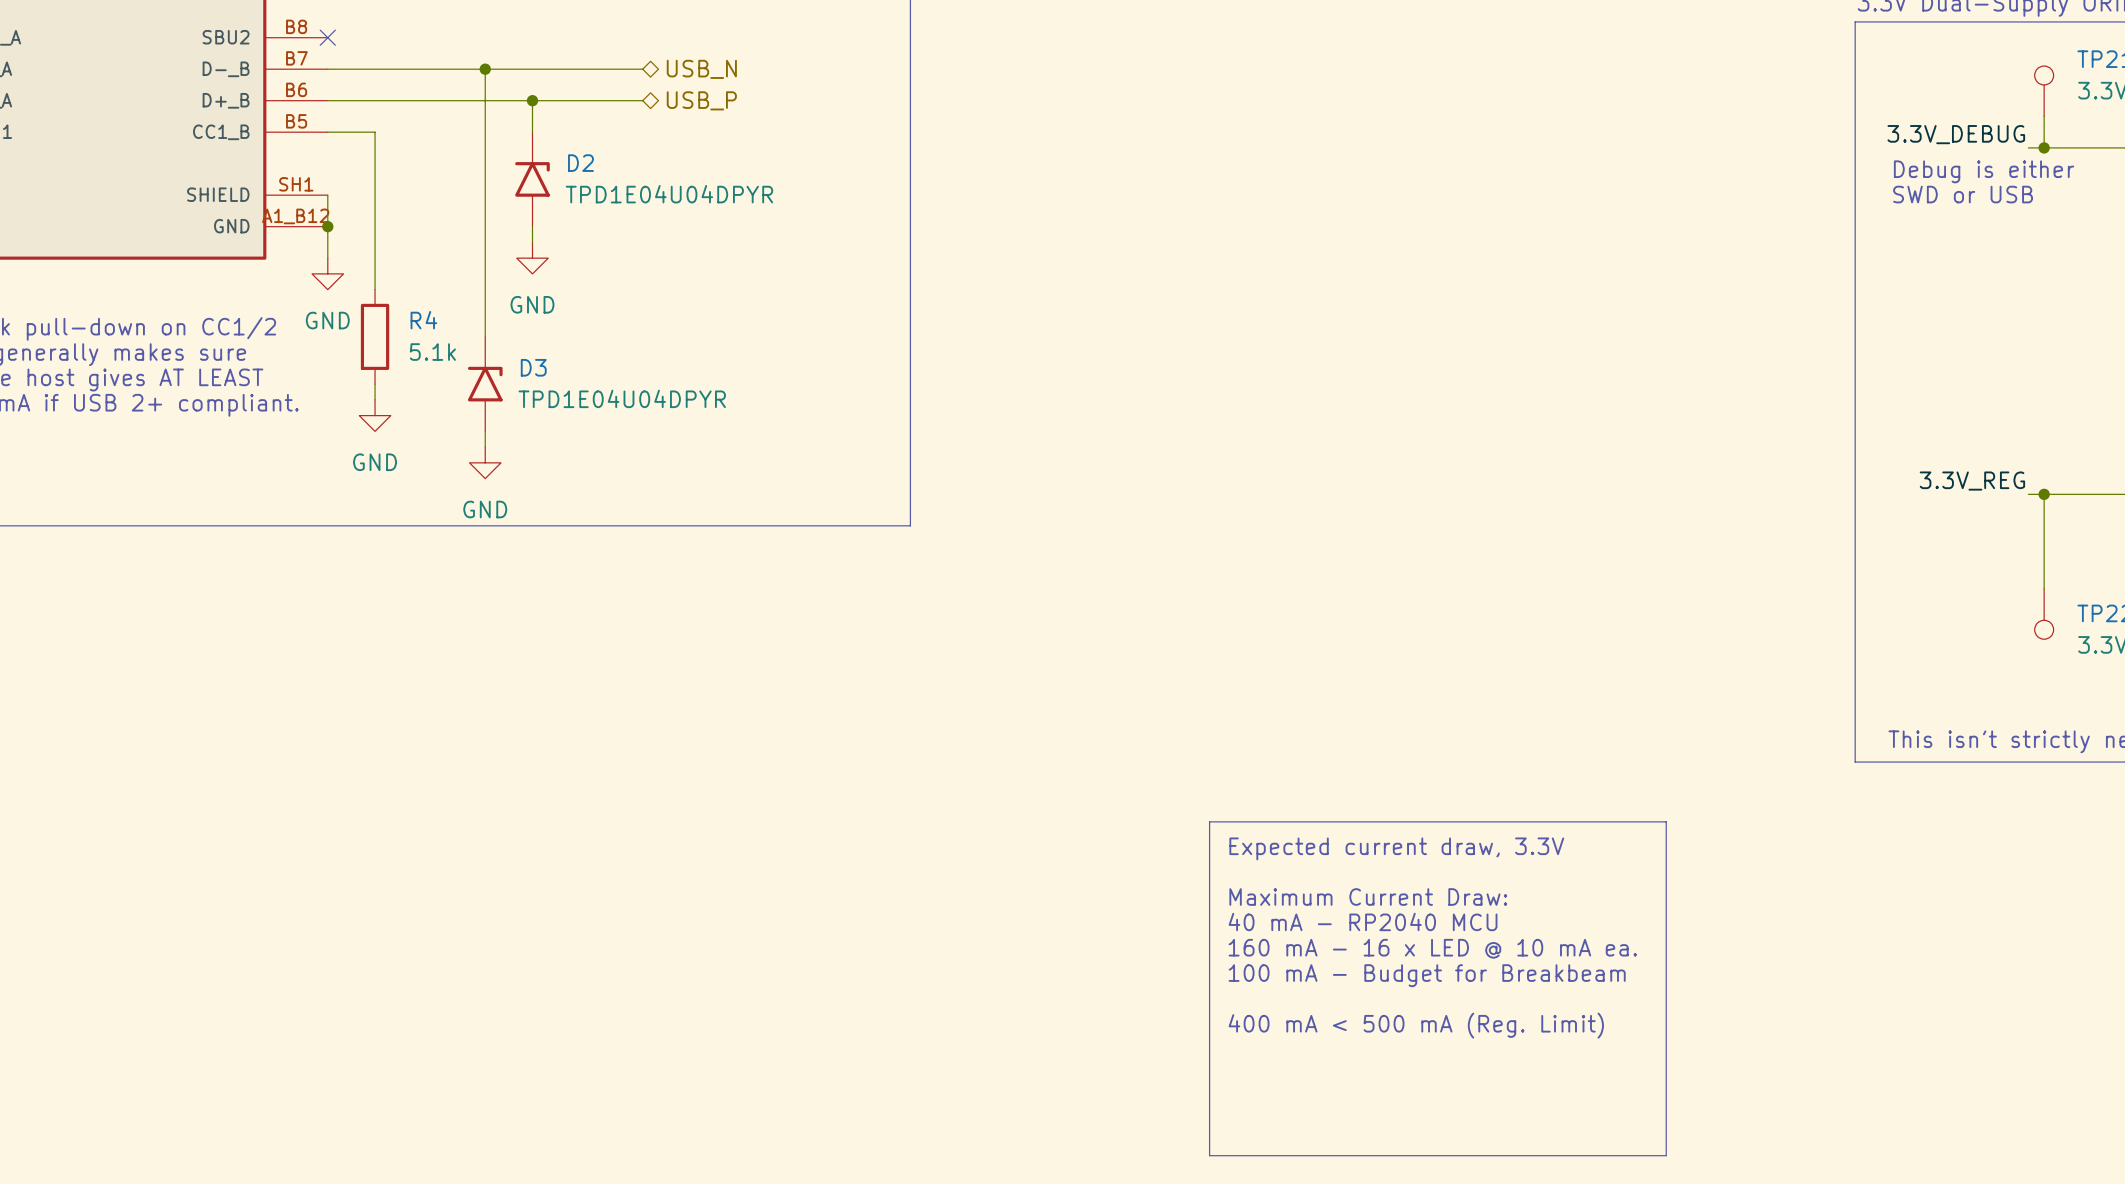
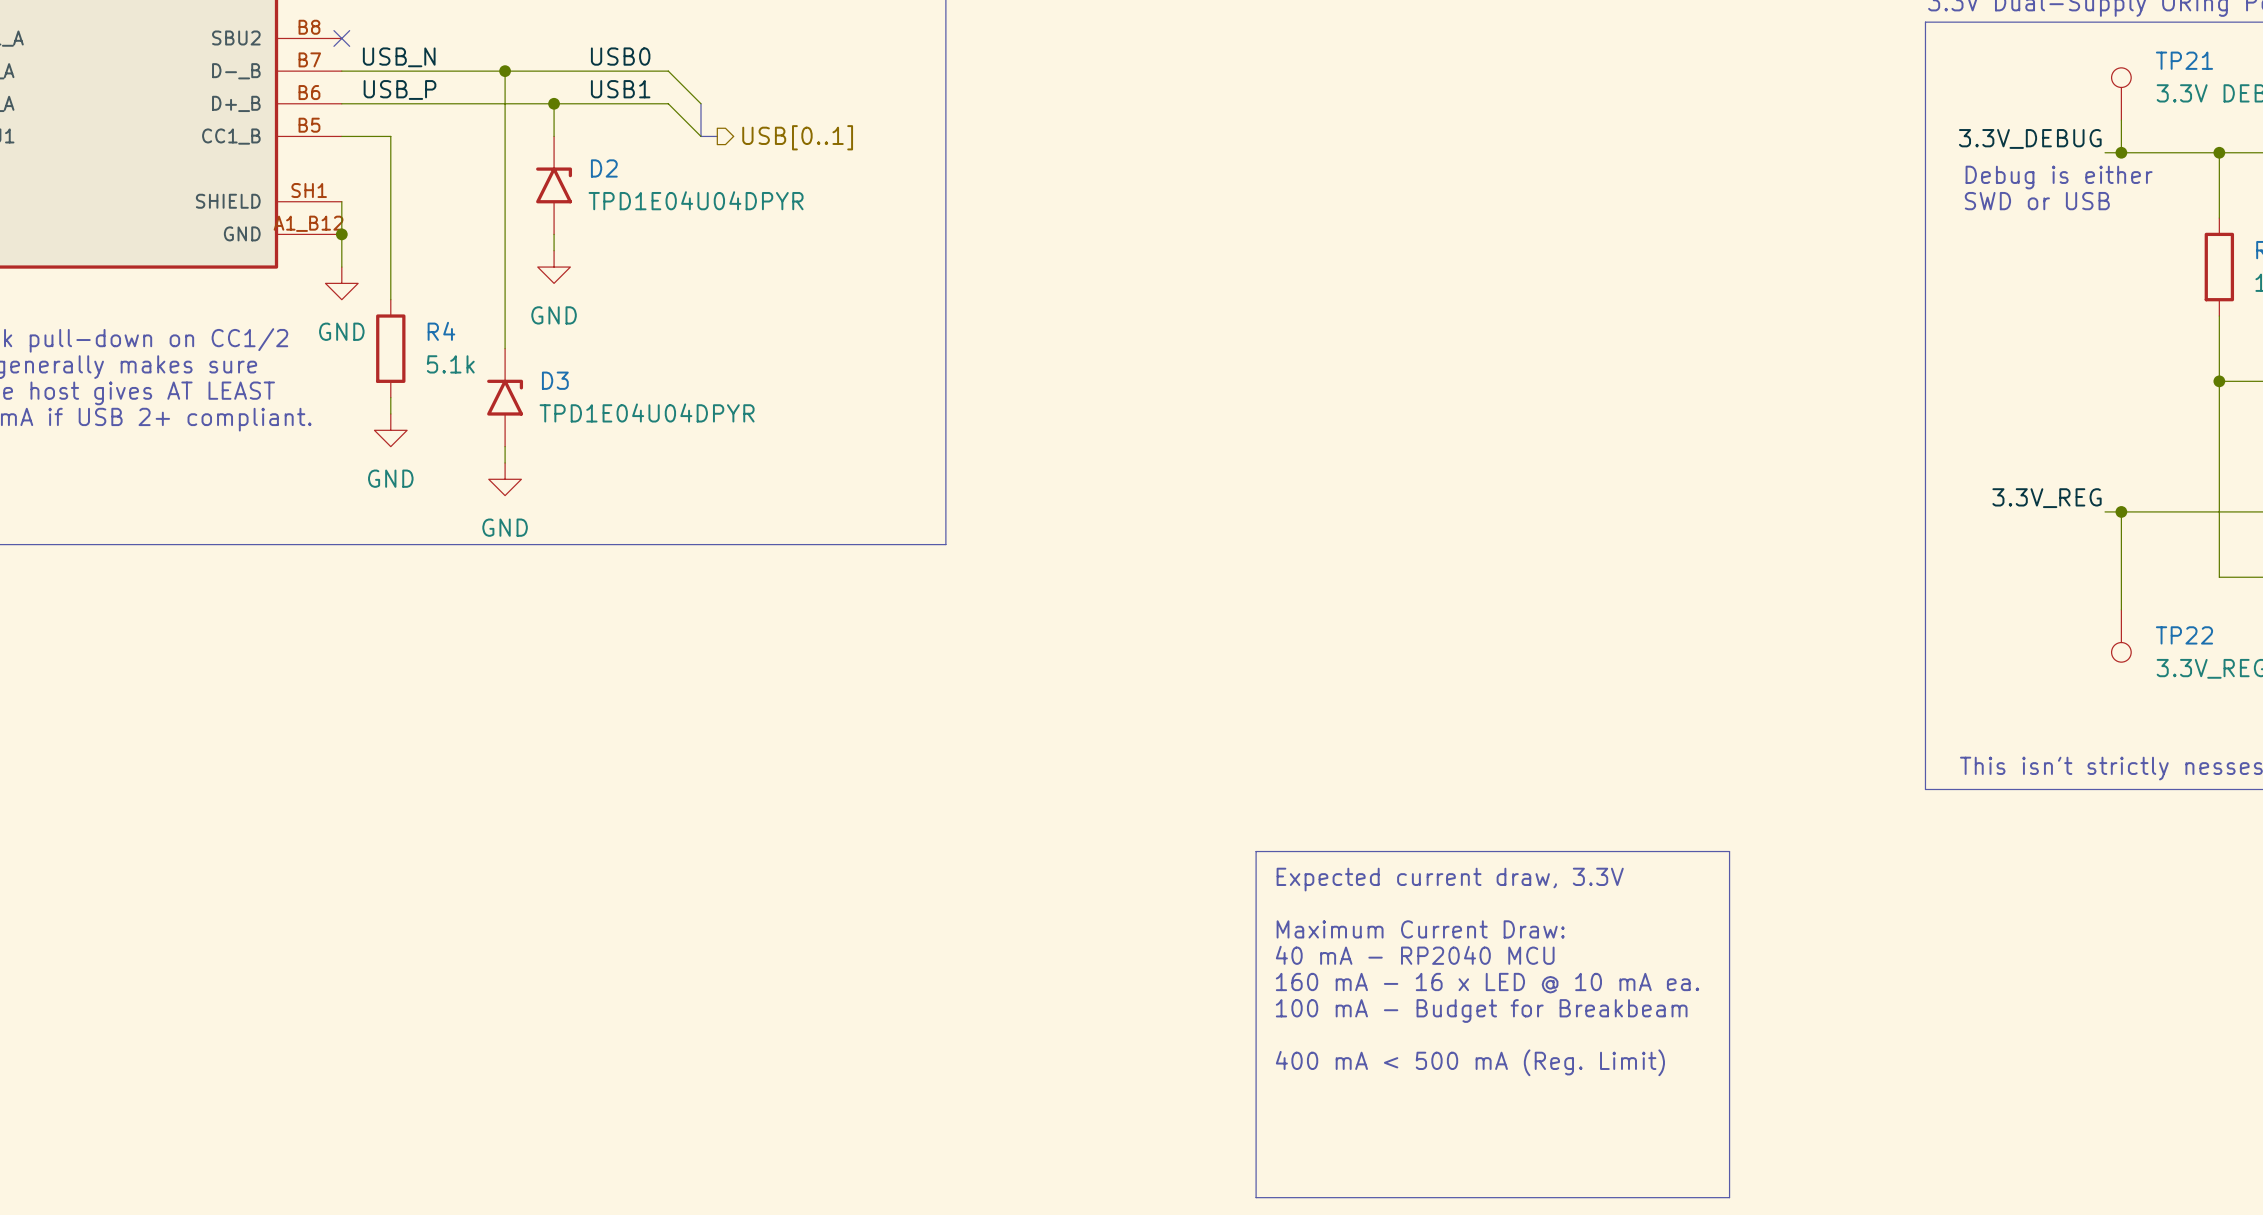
label: none -> USB_N (399, 57)
label: none -> USB0 (620, 56)
wire: none -> (668, 71) (700, 103)
hierarchical label: USB_N (701, 69) -> none
label: none -> USB1 (620, 89)
label: none -> USB_P (400, 89)
wire: none -> (668, 103) (700, 136)
bus: none -> (700, 103) (700, 136) (717, 136)
hierarchical label: USB_P (701, 100) -> none
hierarchical label: none -> USB[0..1] (797, 137)

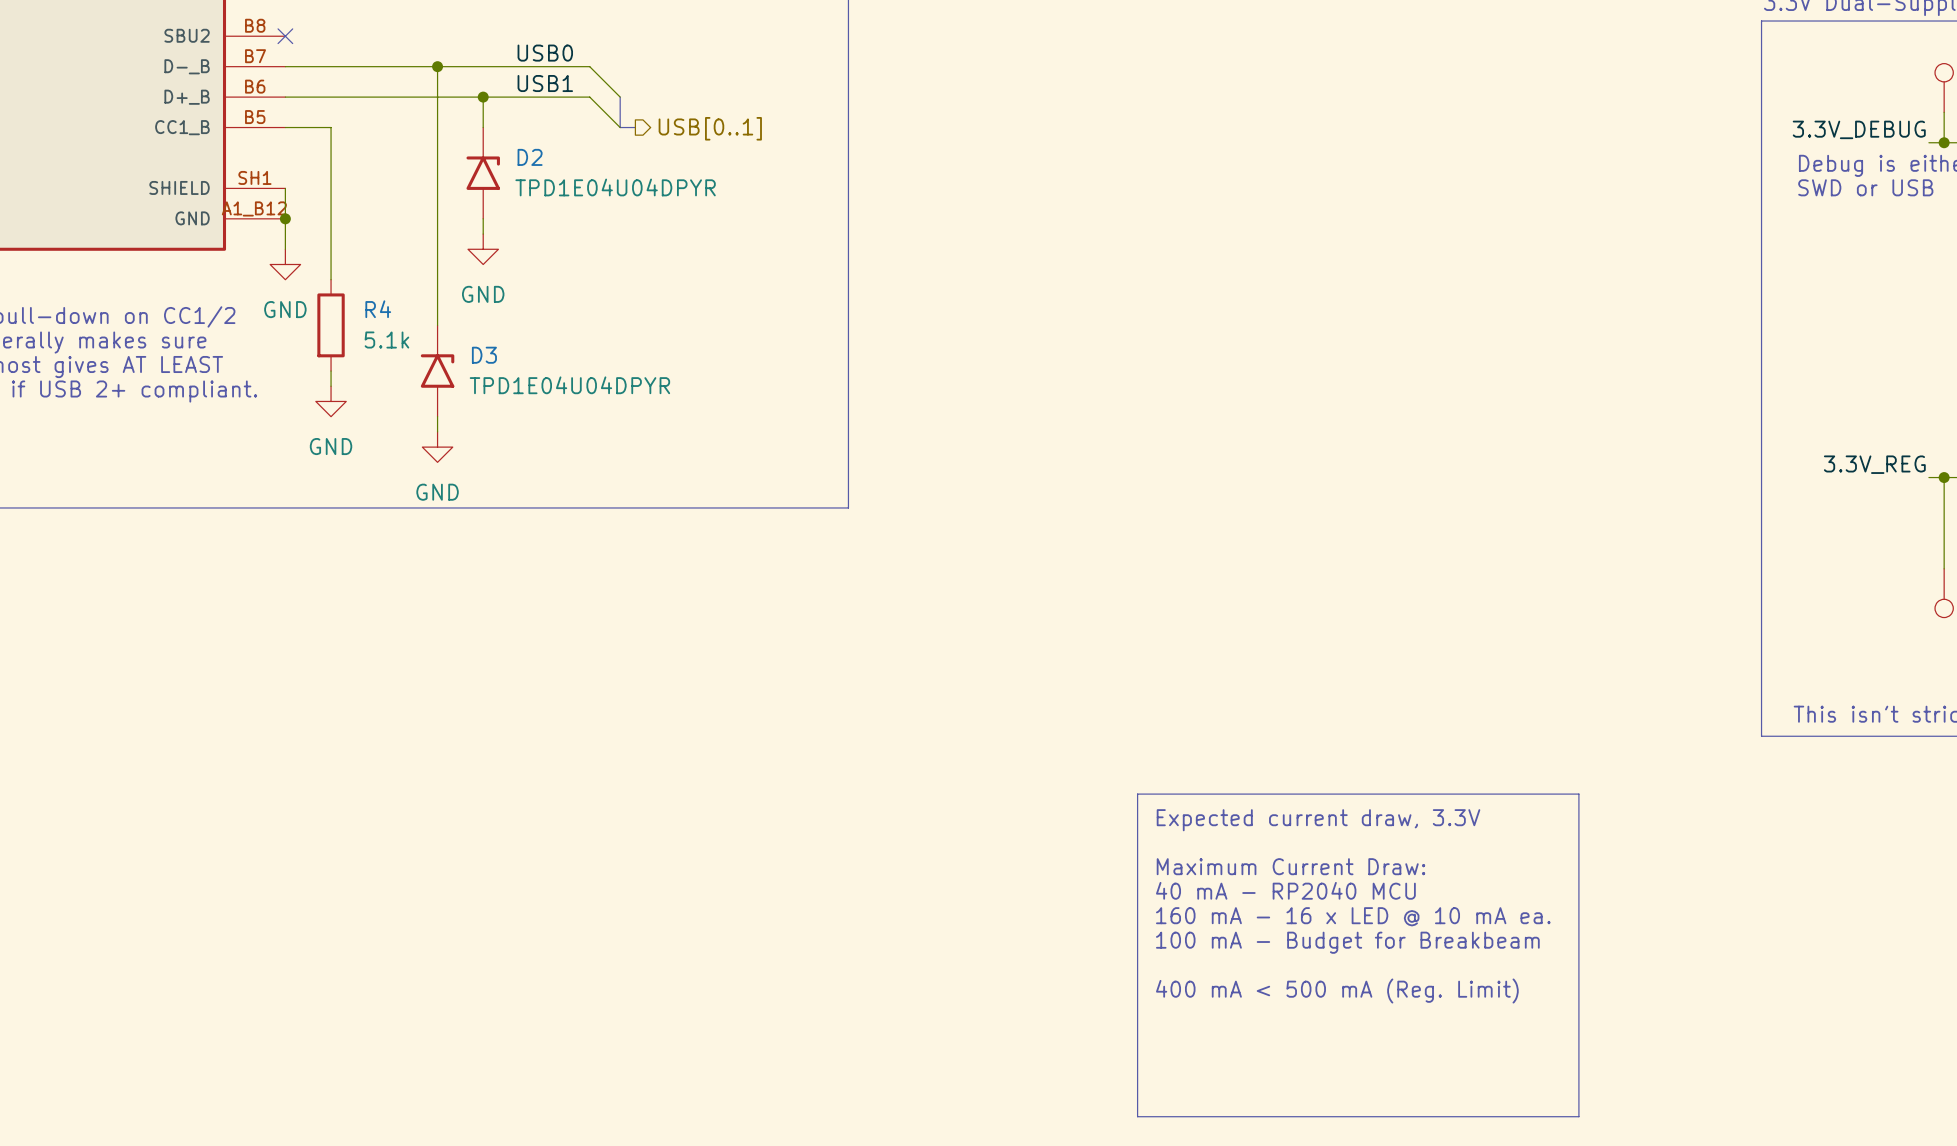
label: USB_N (399, 57) -> none
label: USB_P (400, 89) -> none

